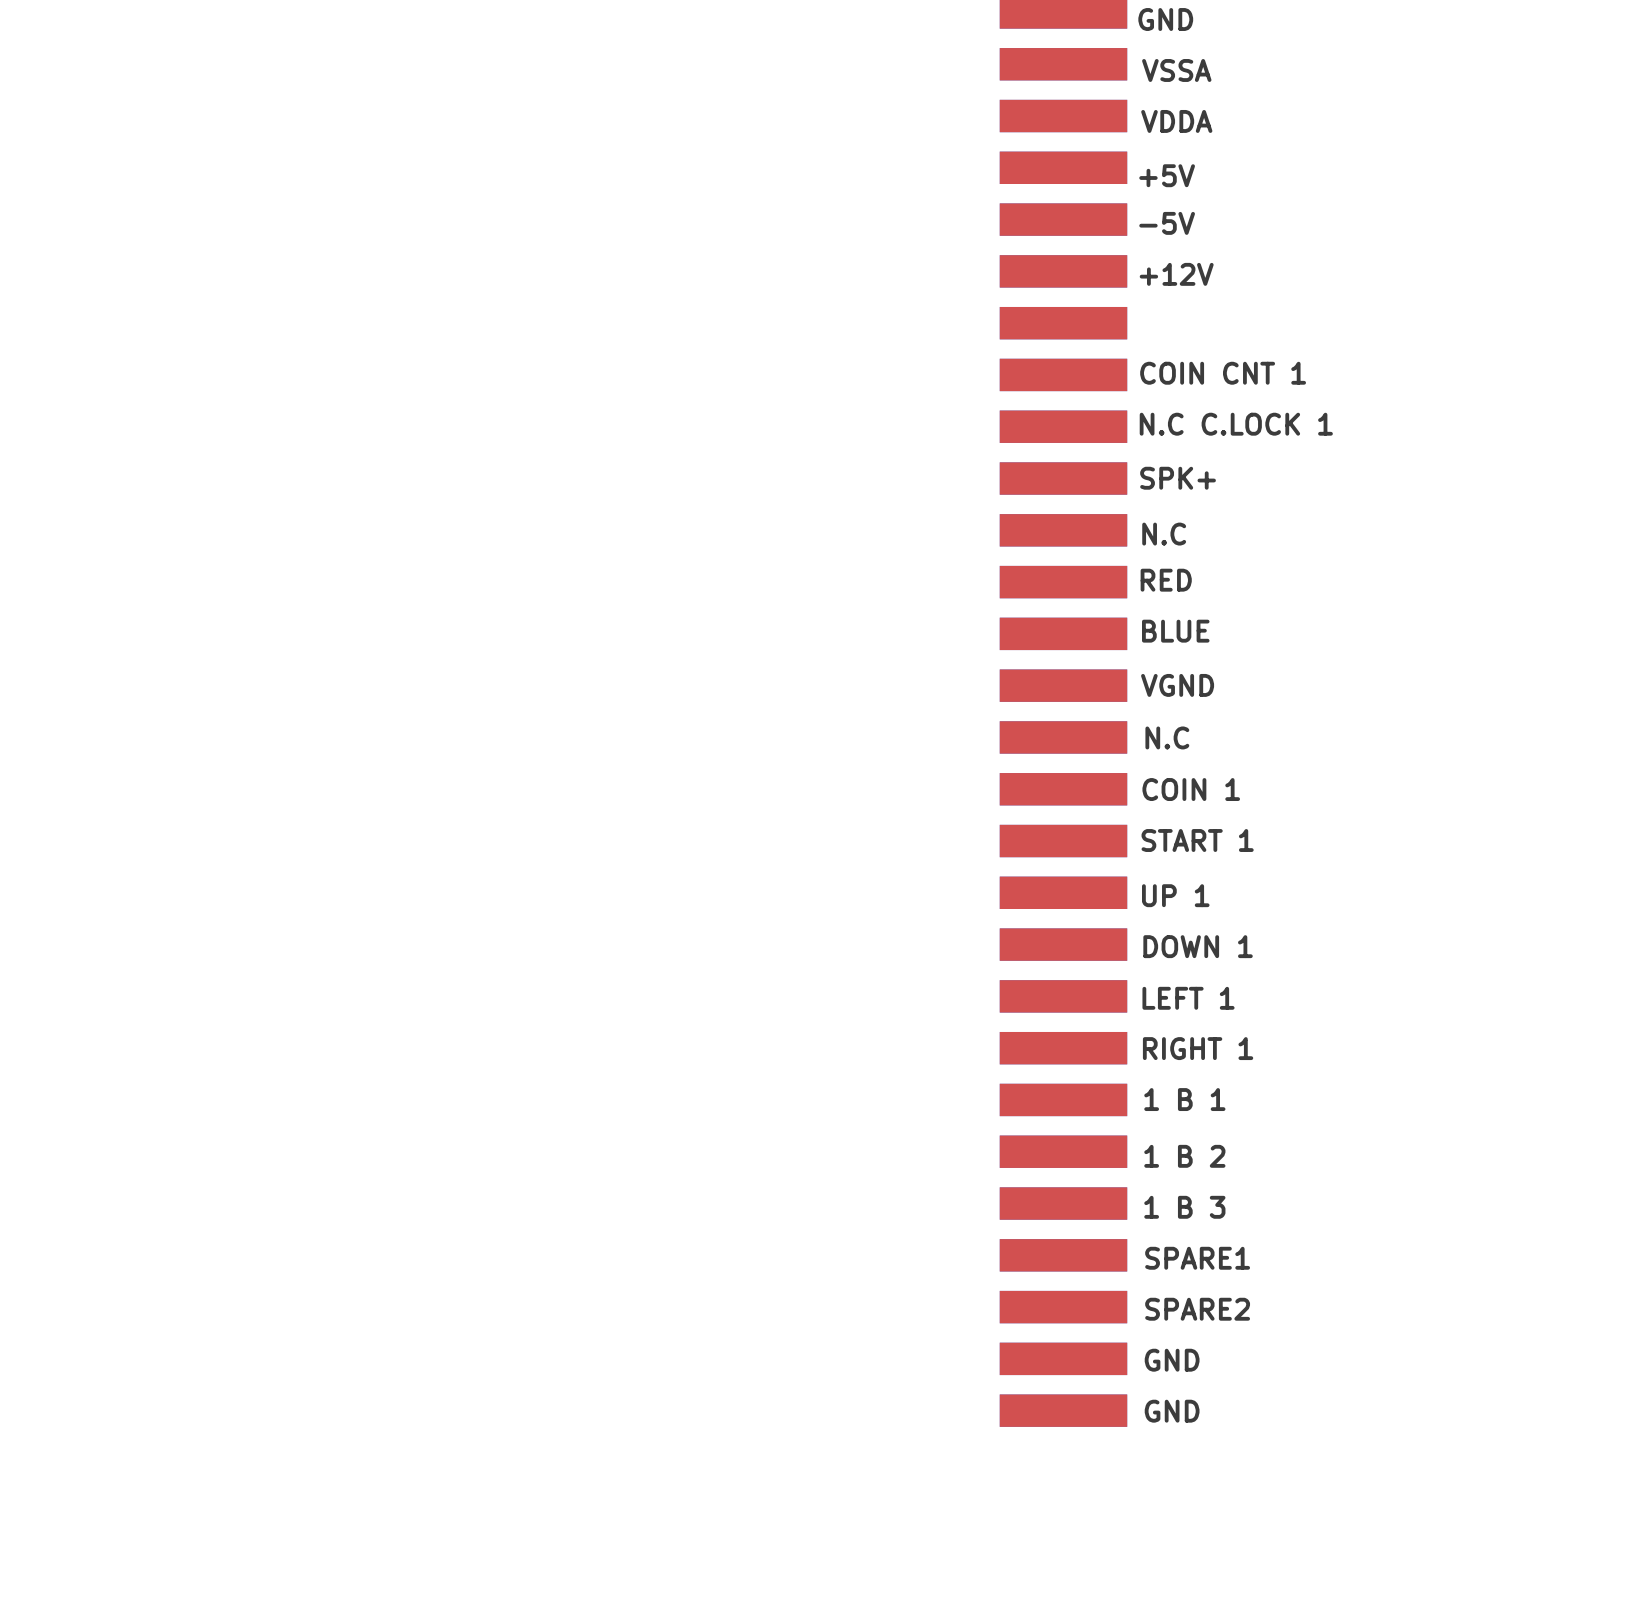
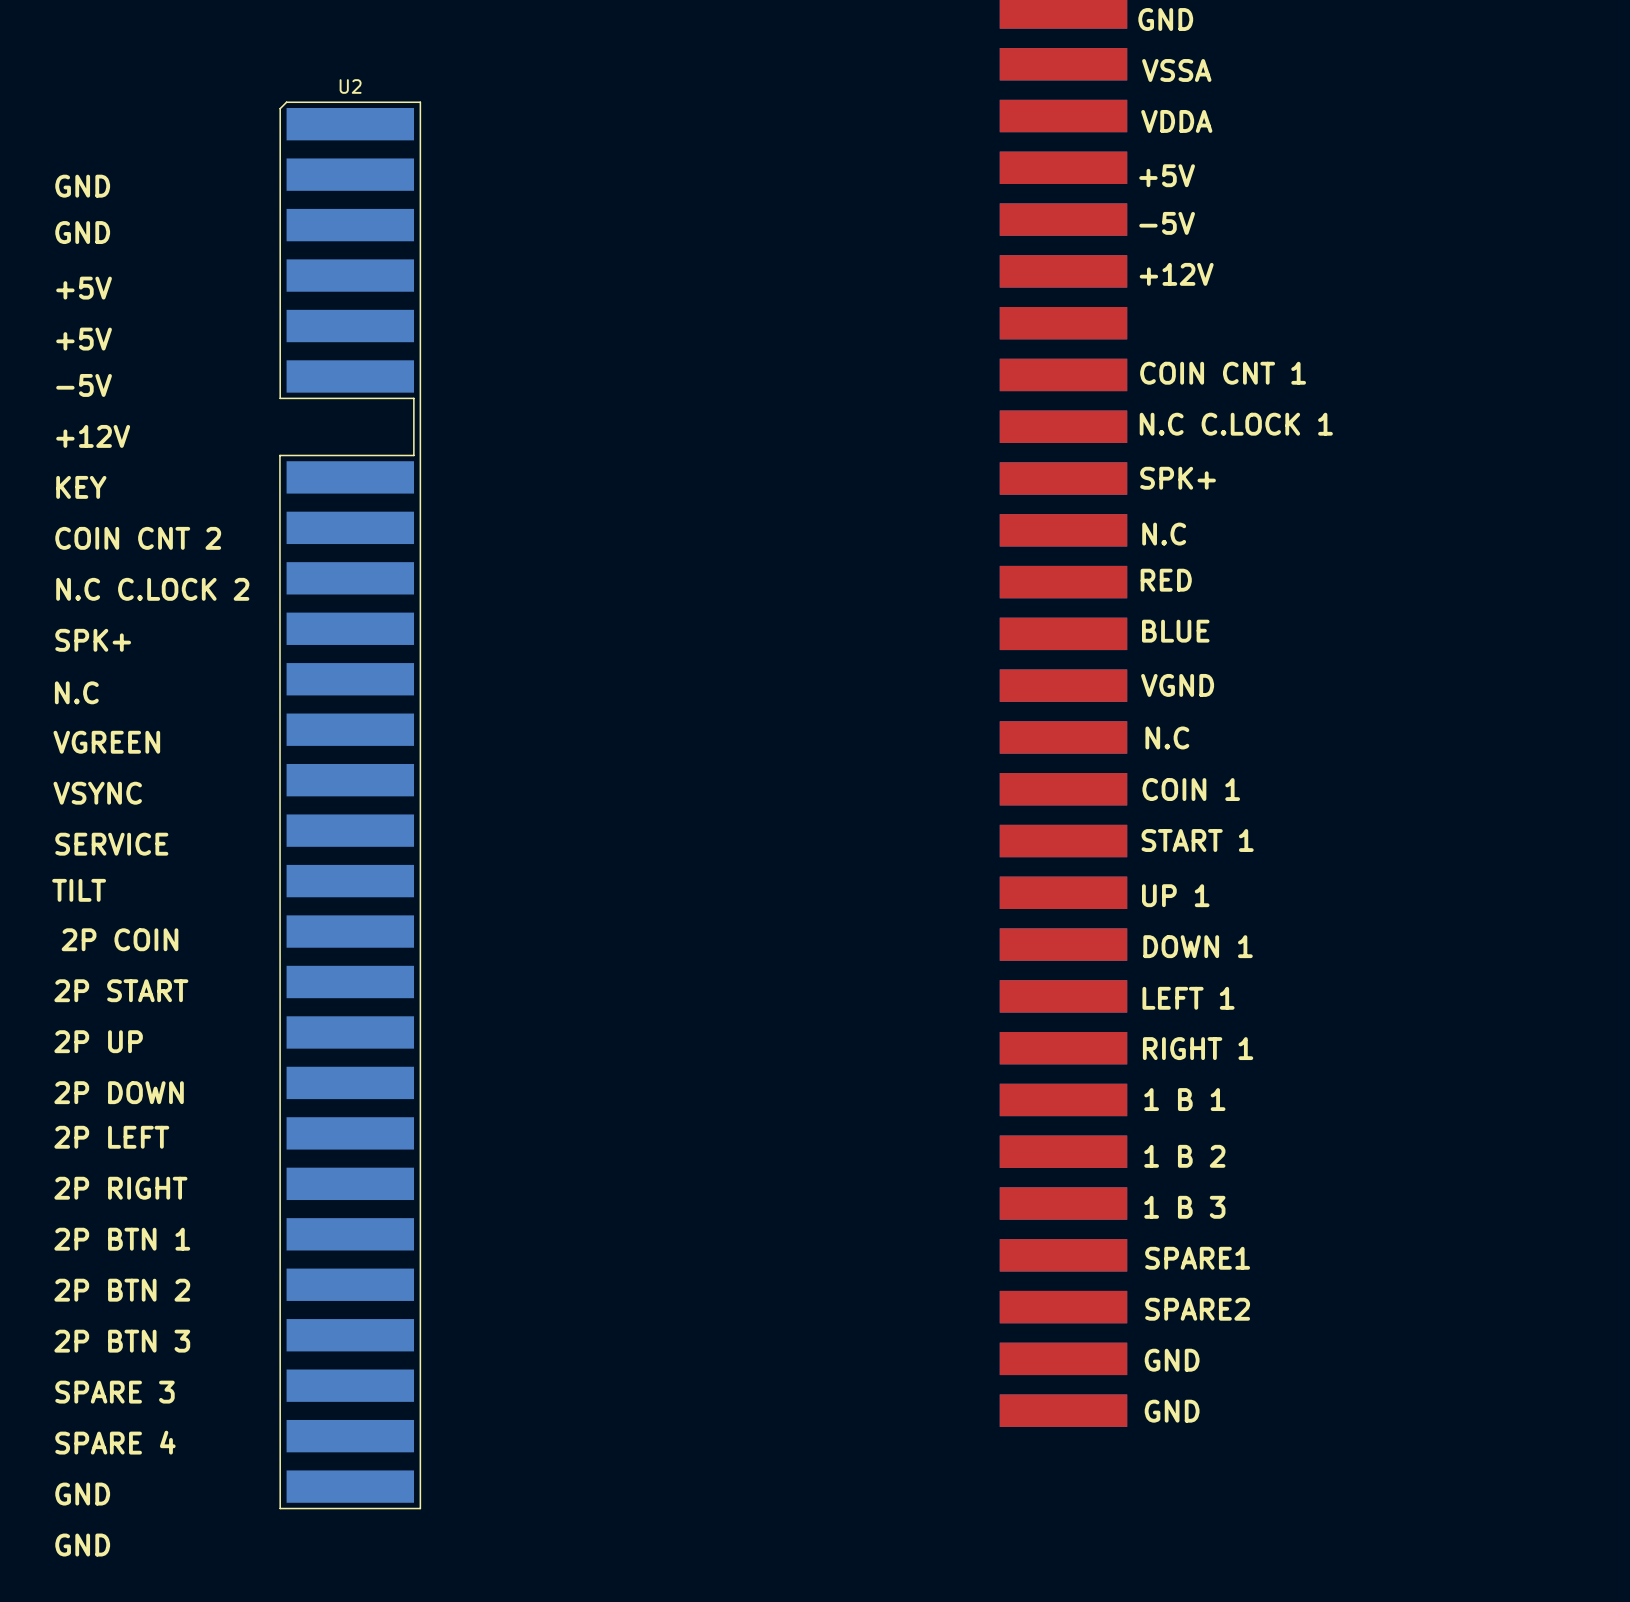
U2: none -> (350, 805)

